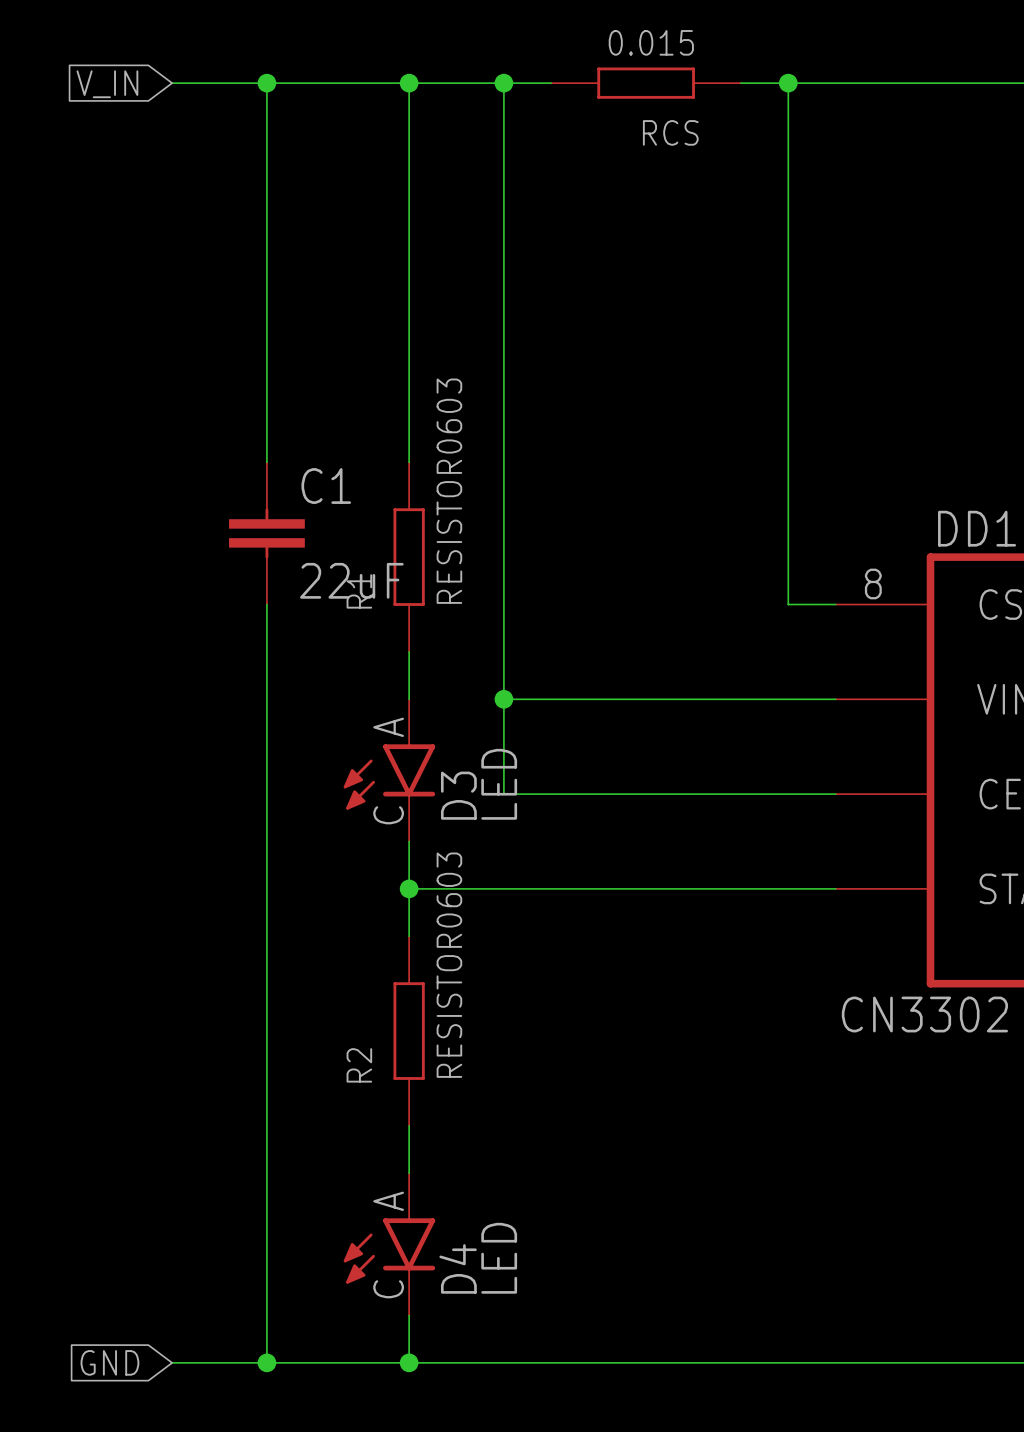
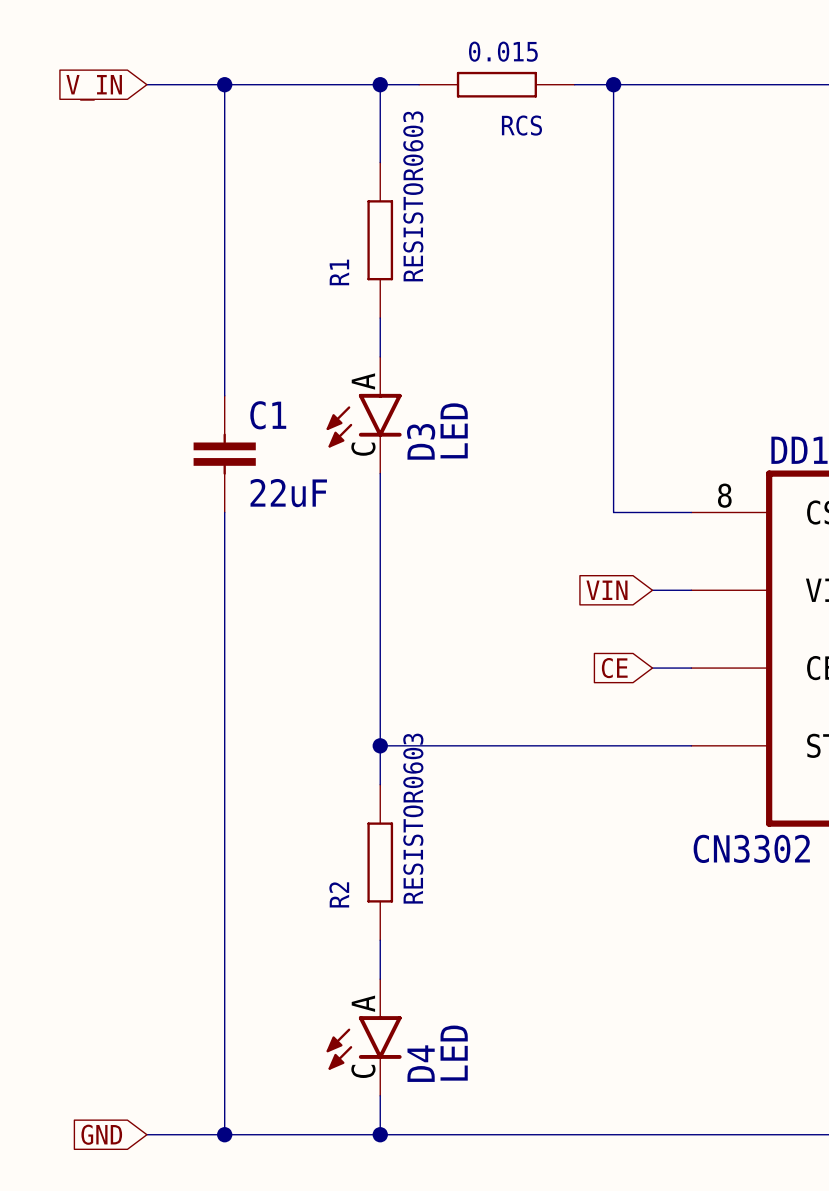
wire: (409, 83) (409, 462) -> none
junction: (409, 83) -> none
wire: none -> (380, 84) (380, 162)
junction: none -> (380, 84)
junction: (503, 83) -> none
wire: (551, 83) (503, 83) (503, 794) (788, 794) -> none
RCS position: (646, 83) -> (496, 84)
wire: (788, 83) (788, 604) -> (574, 84) (613, 84) (613, 512) (652, 512)
junction position: (788, 83) -> (613, 84)
R1 position: (409, 557) -> (380, 240)
wire: none -> (380, 473) (380, 784)
wire: (409, 651) (409, 699) -> (380, 318) (380, 356)
wire: (503, 699) (788, 699) -> none
junction: (503, 699) -> none
global label: none -> VIN (606, 590)
D3 position: (389, 770) -> (364, 415)
global label: none -> CE (614, 668)
wire: (409, 841) (409, 936) -> none
wire: (409, 888) (456, 888) -> none
junction position: (409, 888) -> (380, 745)
R2 position: (409, 1031) -> (380, 862)
wire: (409, 1125) (409, 1173) -> (380, 940) (380, 979)
D4 position: (389, 1244) -> (364, 1037)
wire: (409, 1315) (409, 1362) -> (380, 1095) (380, 1134)
junction position: (409, 1362) -> (380, 1134)

